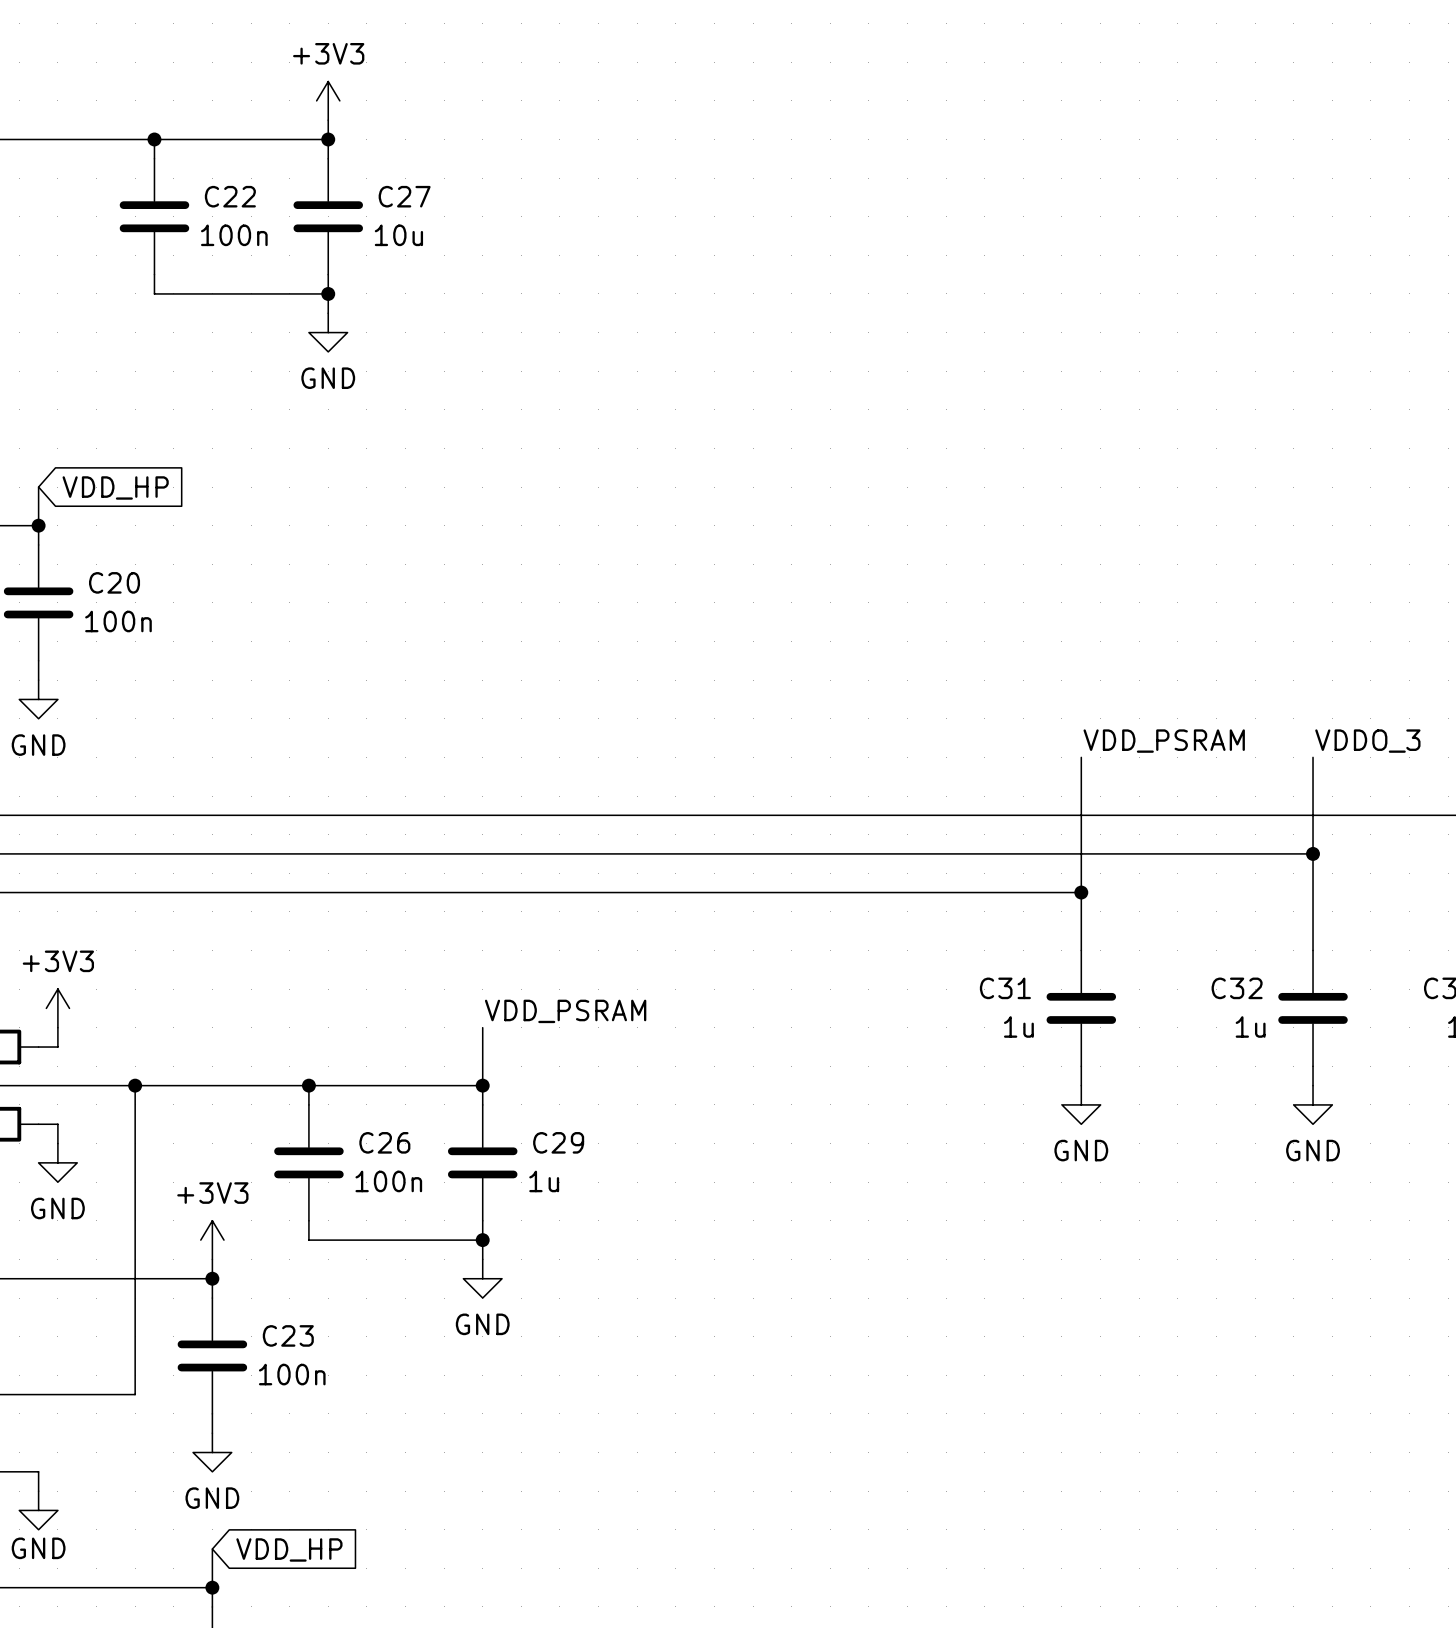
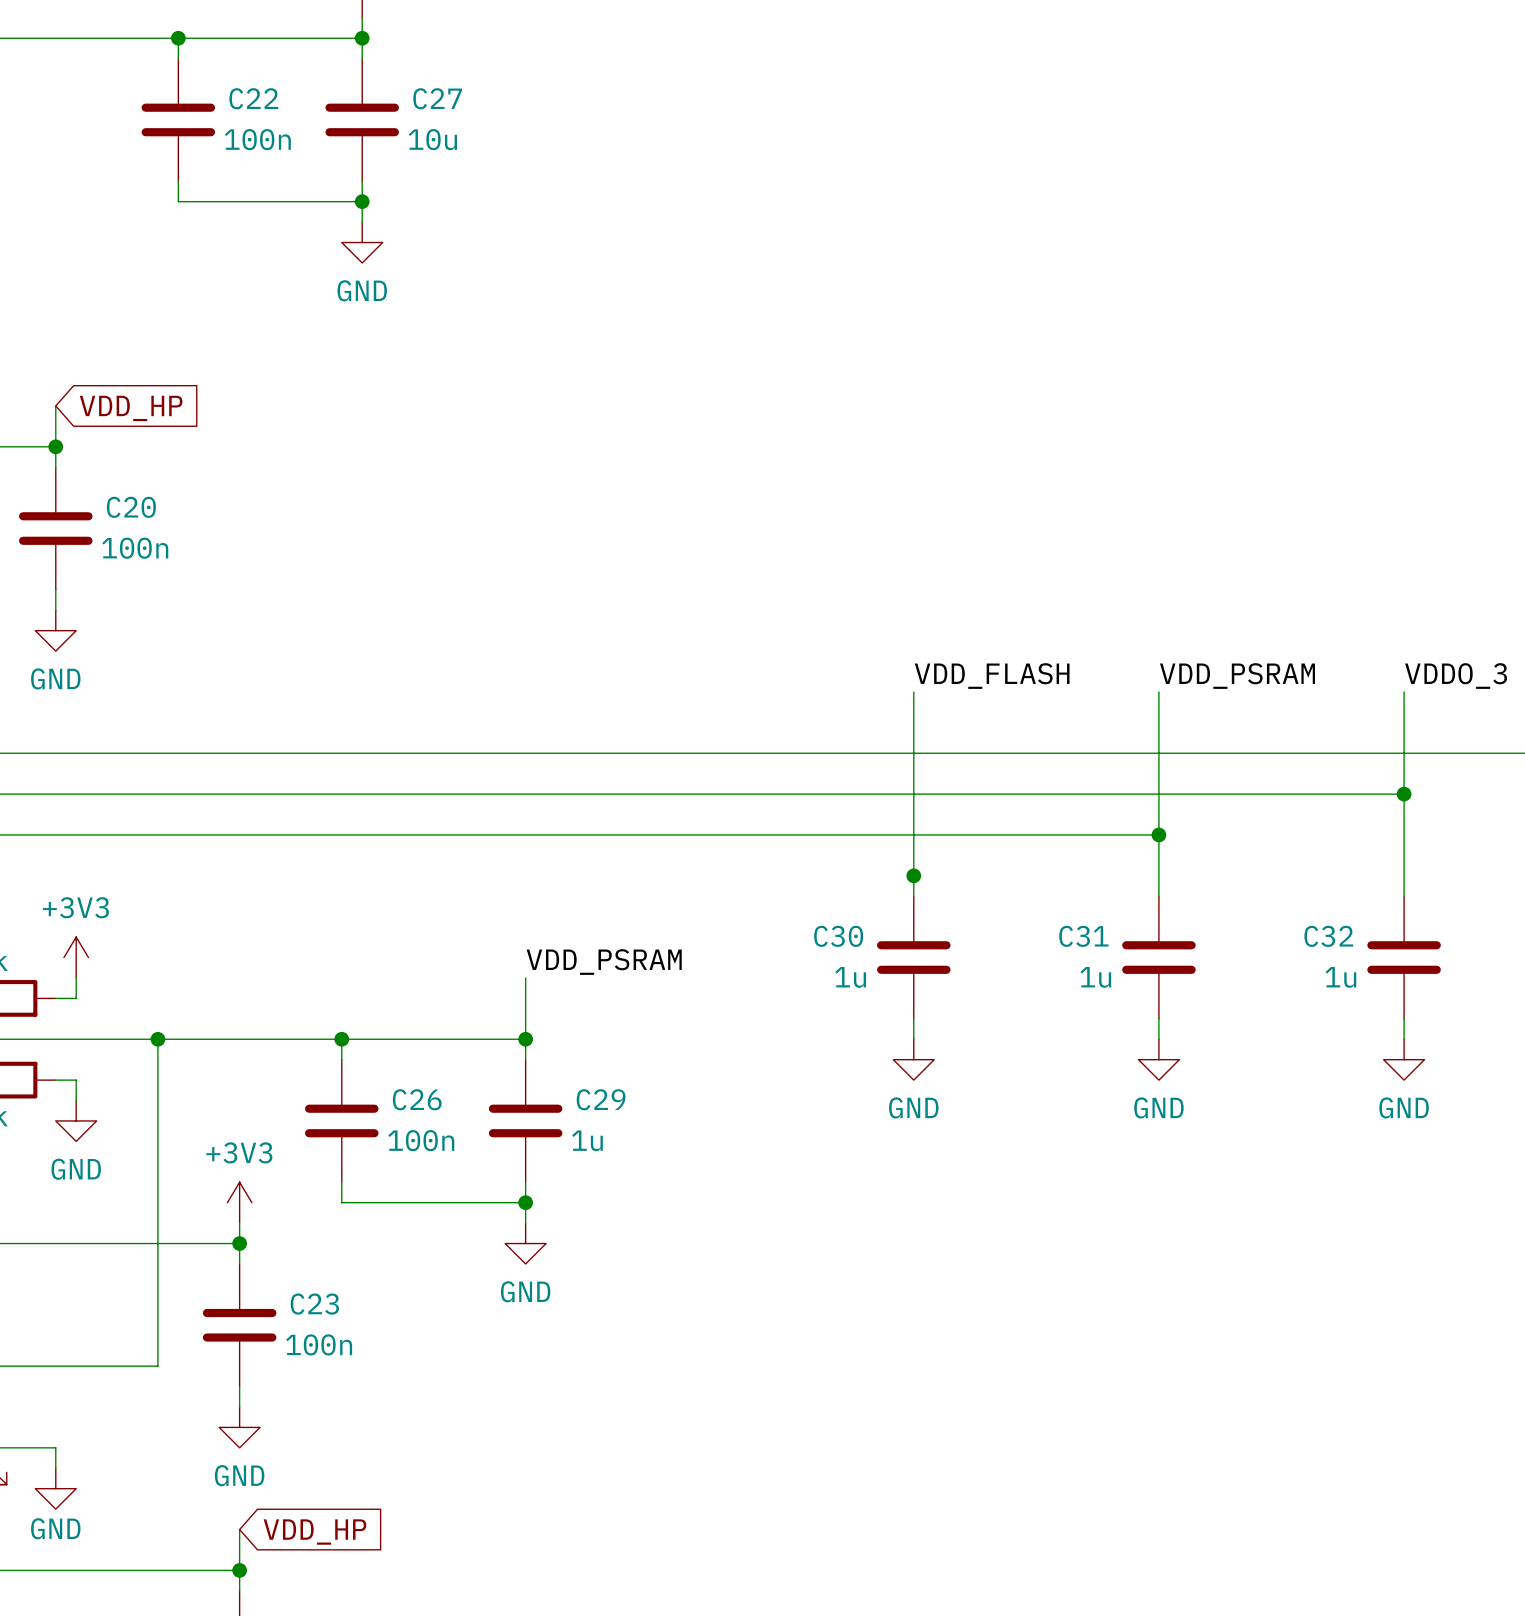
label: none -> VDD_FLASH (992, 676)
wire: none -> (913, 691) (913, 896)
junction: none -> (913, 875)
C30: none -> 1u (913, 957)
wire: none -> (913, 1018) (913, 1039)
power symbol: none -> GND (913, 1059)

